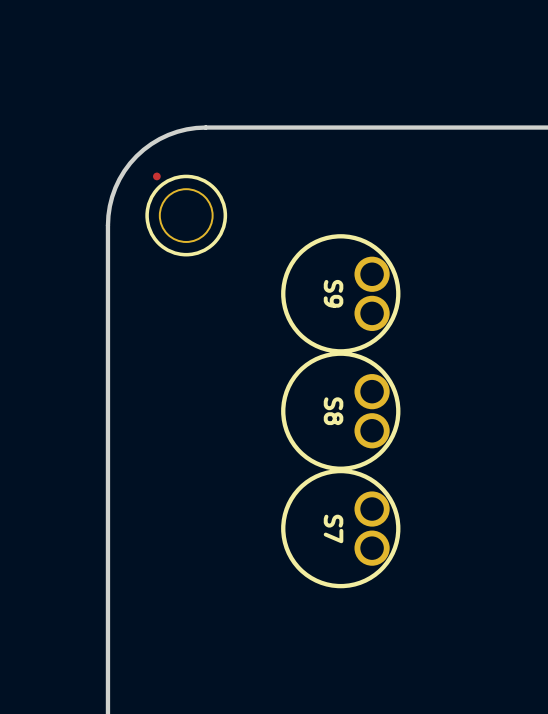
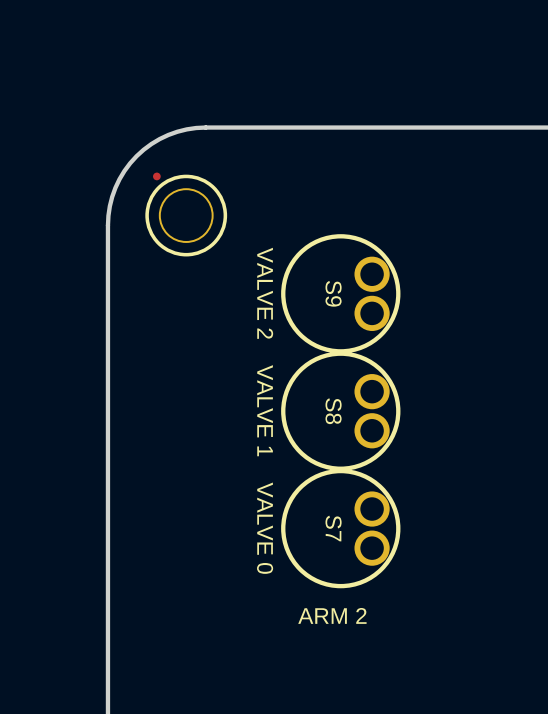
text: none -> VALVE 2 (265, 293)
text: none -> VALVE 1 (265, 410)
text: none -> VALVE 0 (265, 528)
text: none -> ARM 2 (332, 615)

